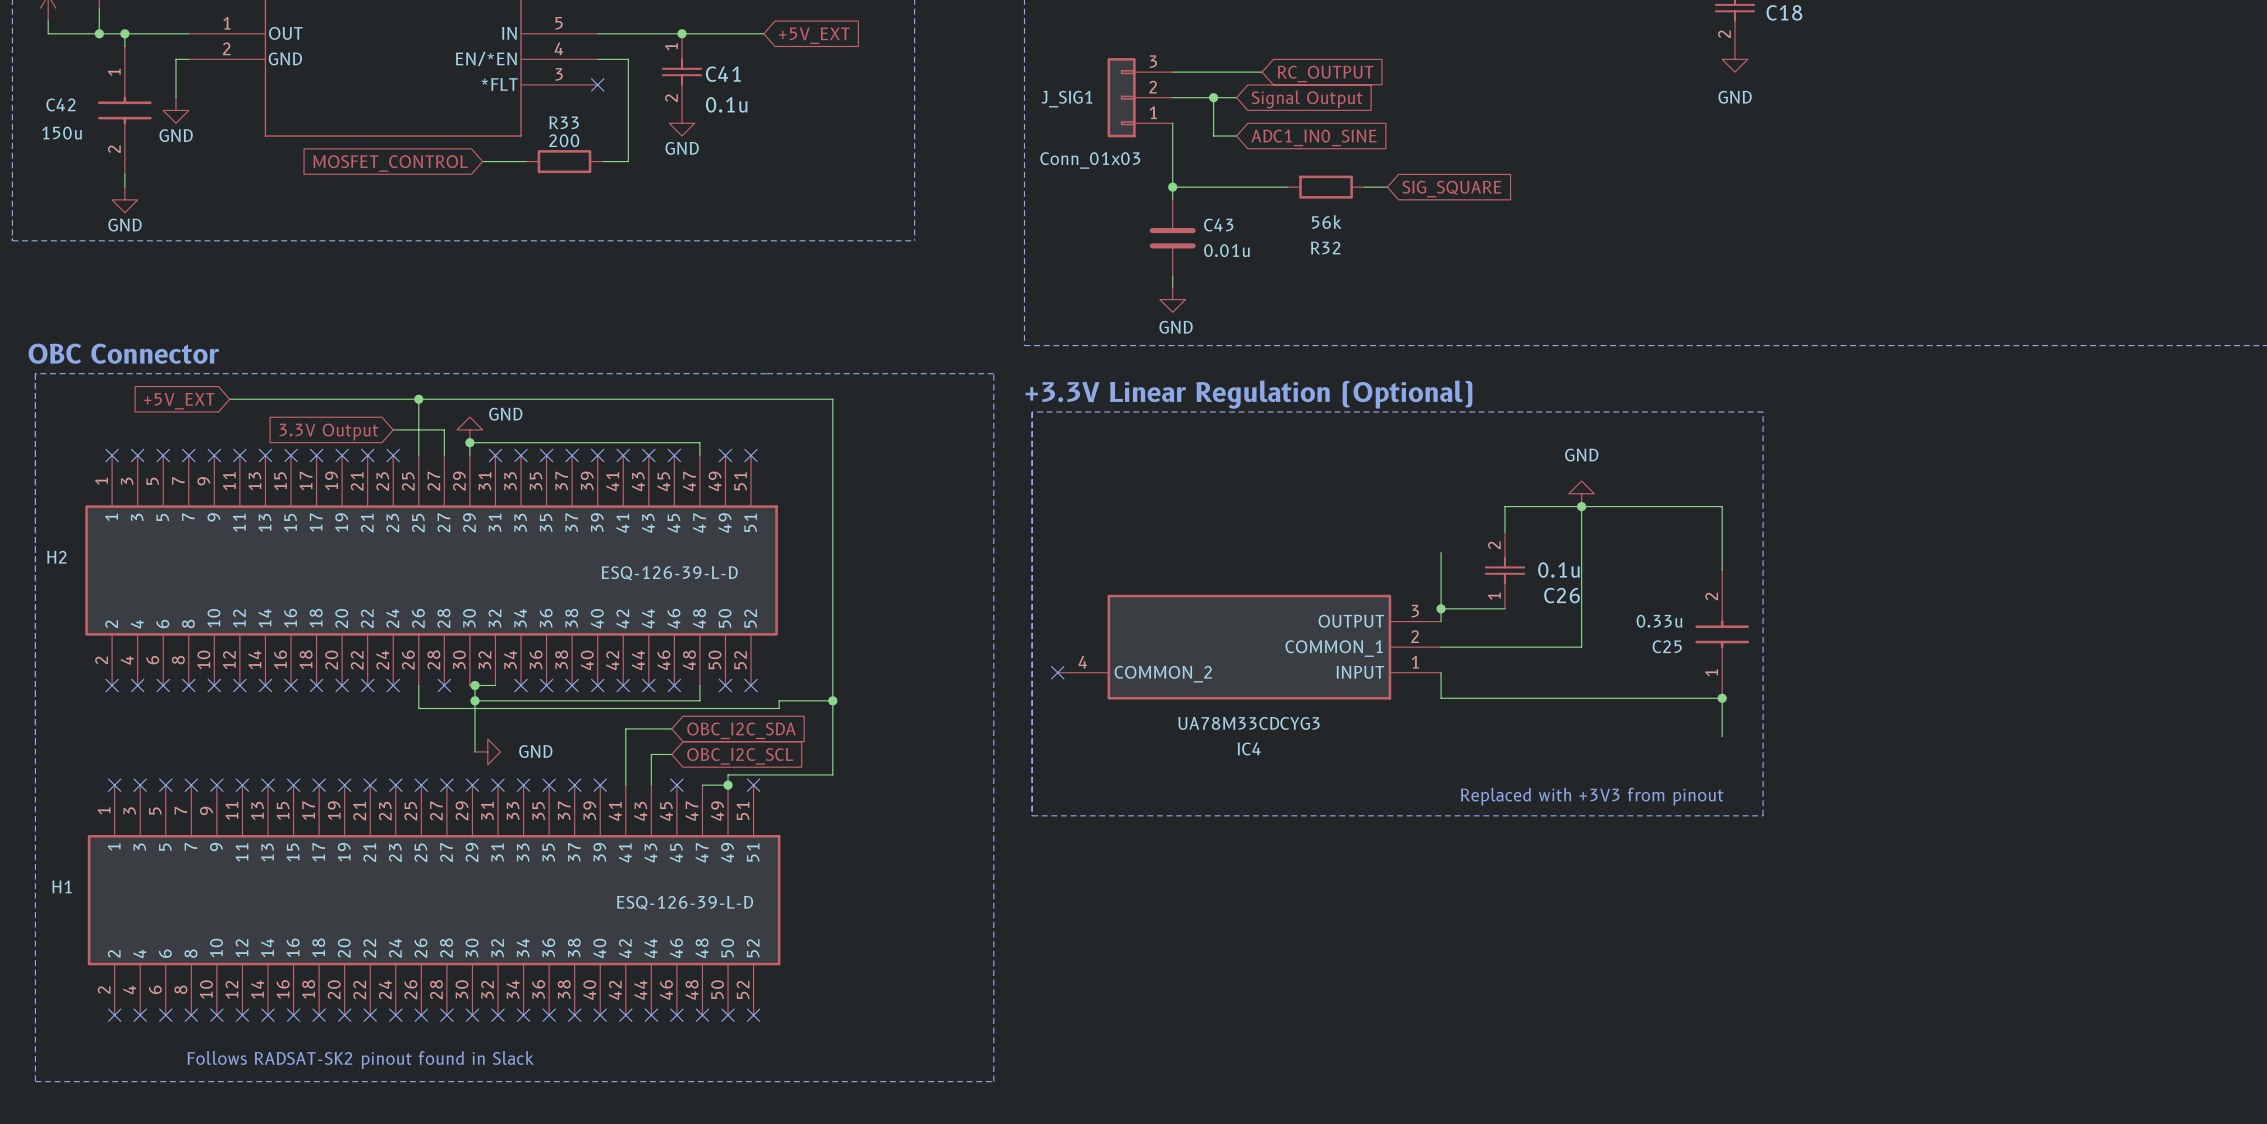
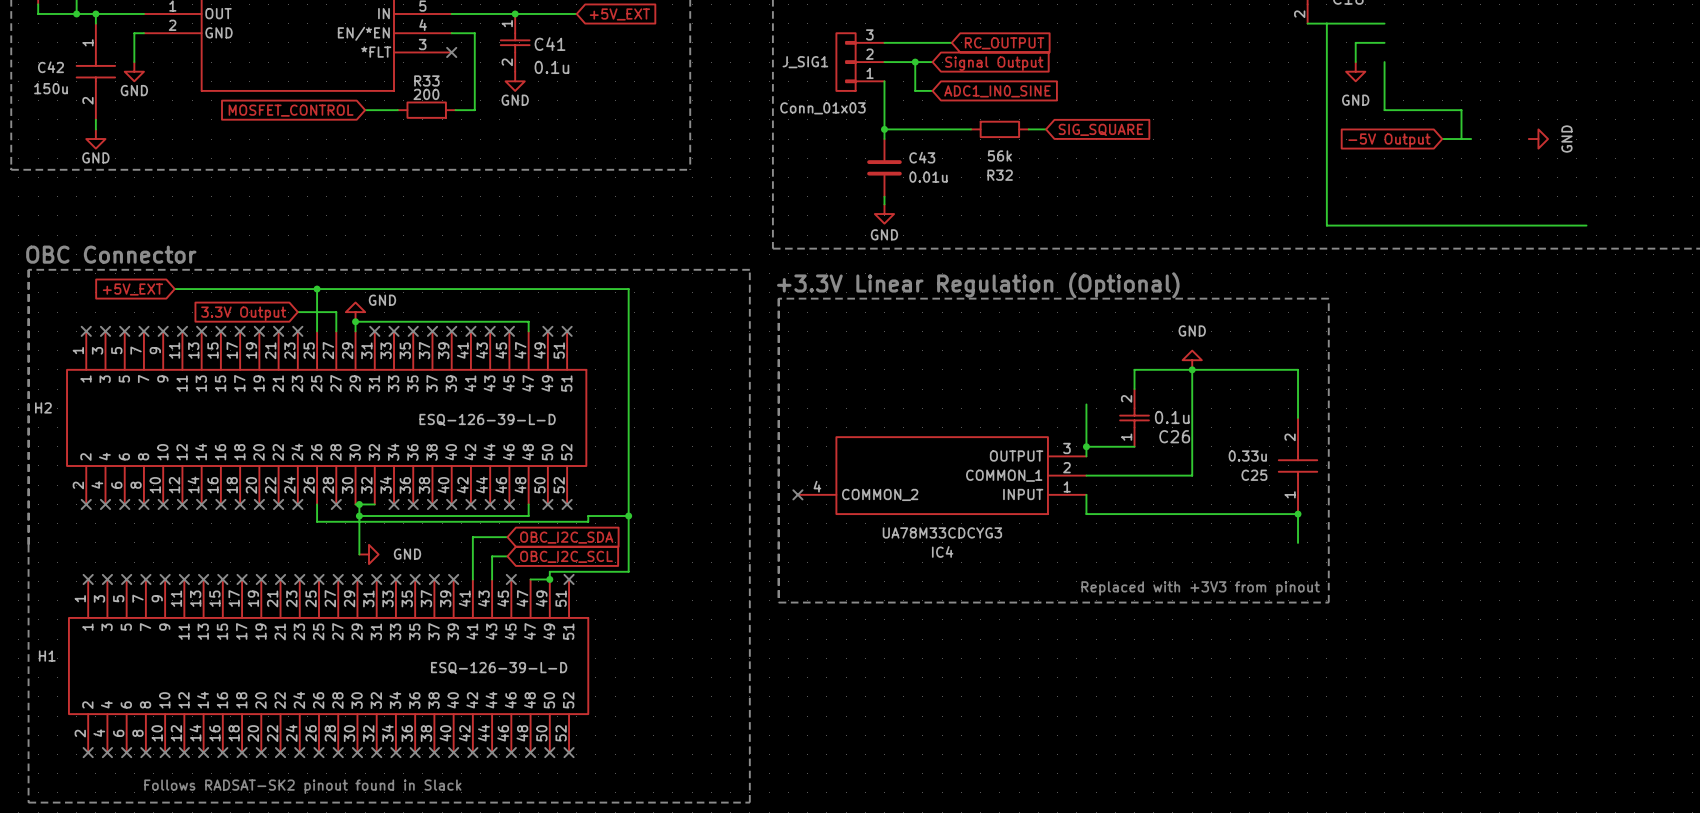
wire: none -> (1307, 23) (1384, 23)
wire: none -> (1326, 23) (1326, 225) (1586, 225)
power symbol position: GND (1734, 59) -> GND (1355, 71)
wire: none -> (1384, 42) (1355, 42) (1355, 62)
wire: none -> (1384, 62) (1384, 110) (1461, 110) (1461, 139)
wire: none -> (1442, 139) (1471, 139)
power symbol: none -> GND (1538, 139)
global label: none -> -5V Output (1389, 140)

